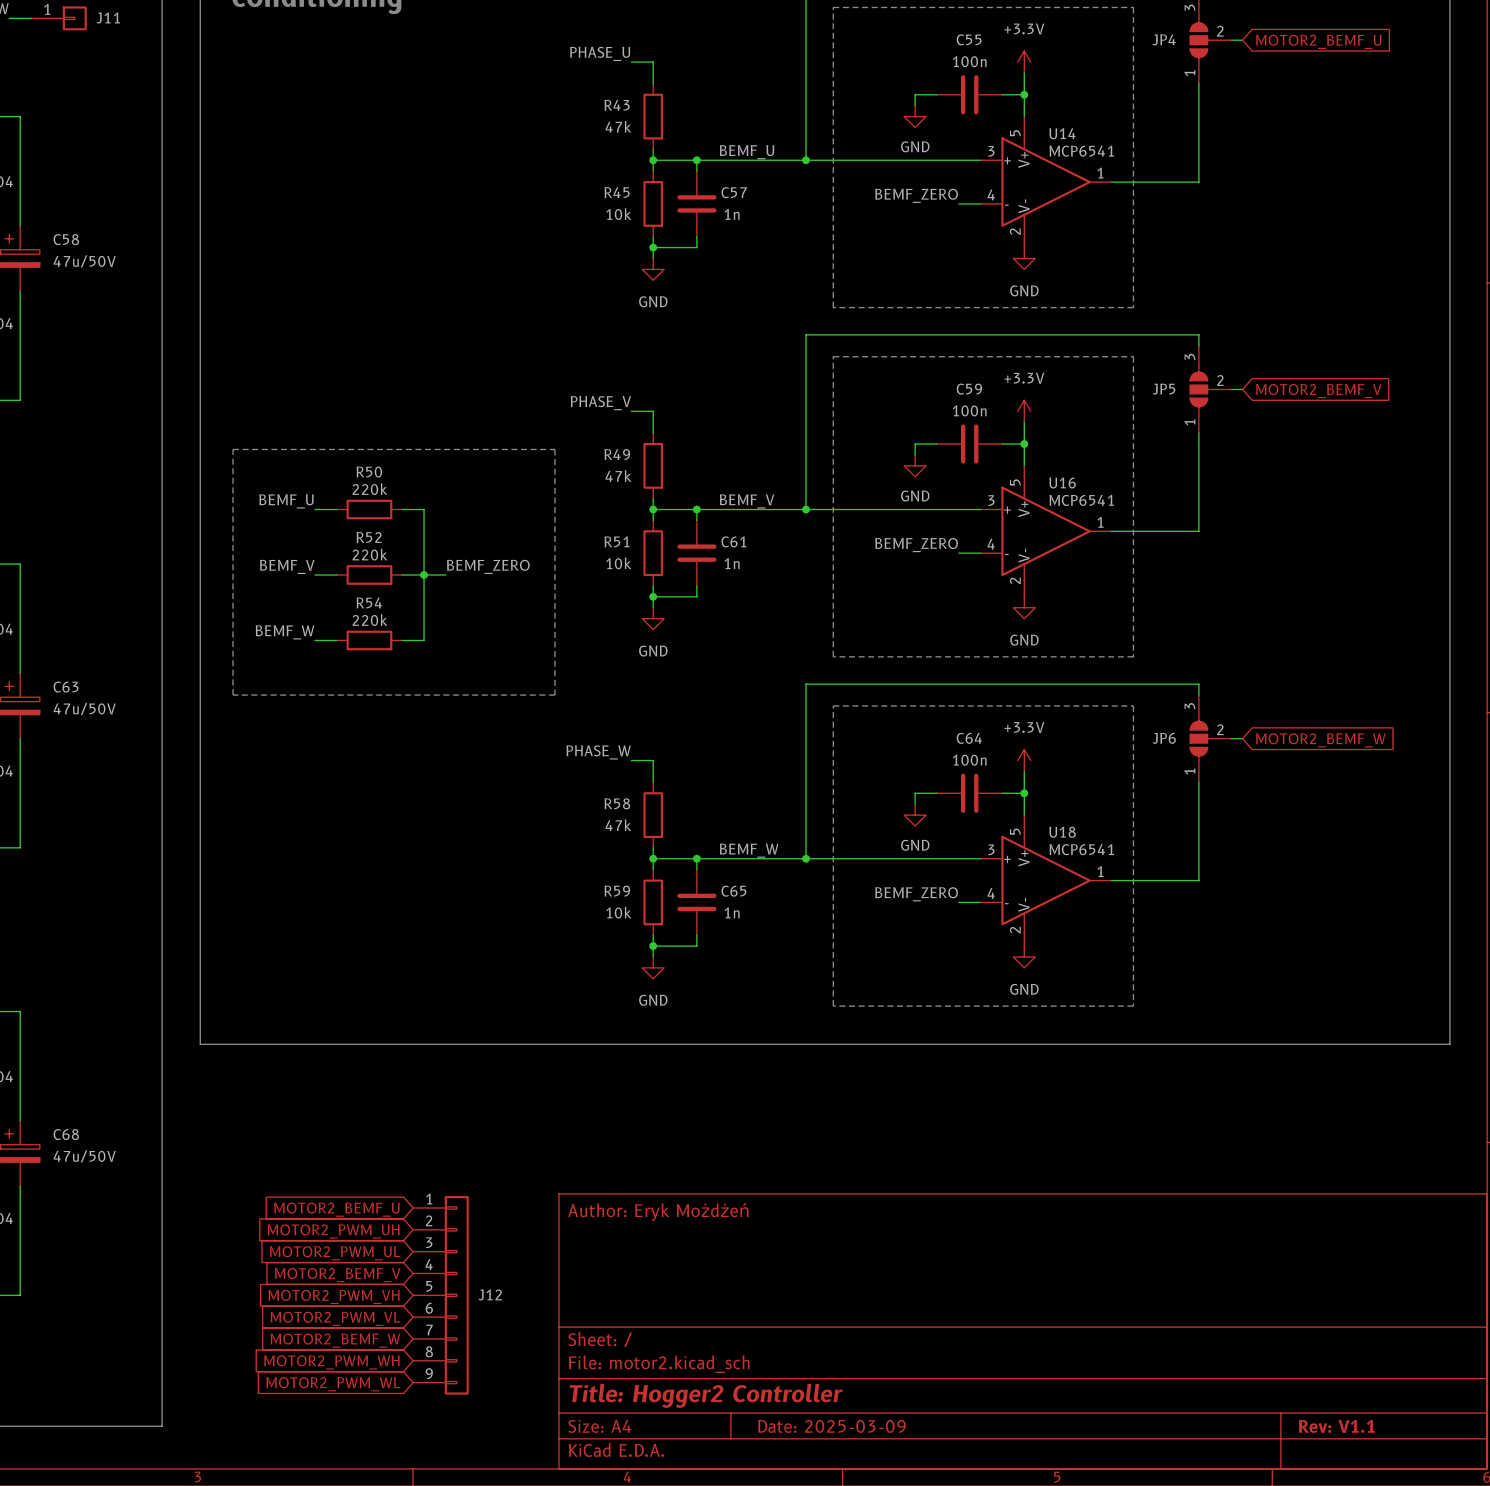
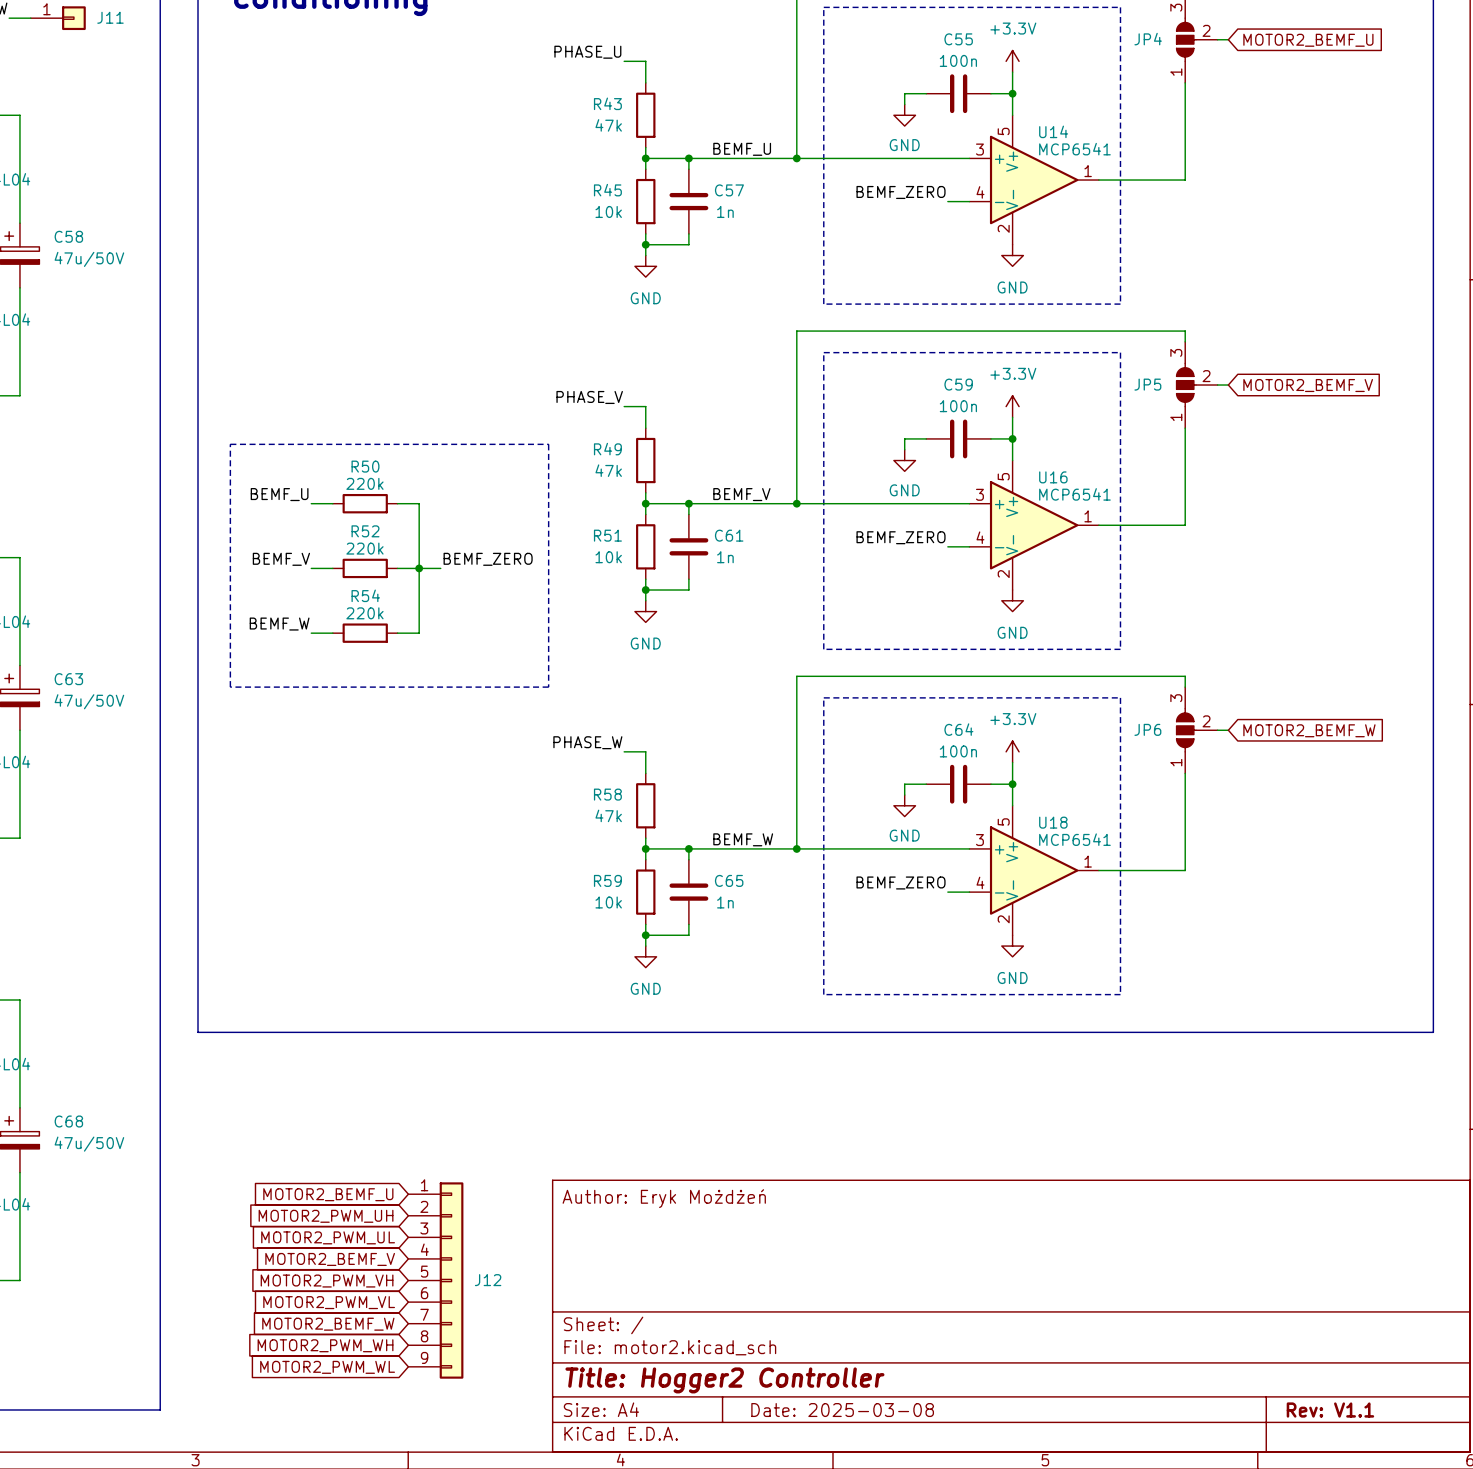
title block: Date: 2025-03-09 (831, 1426) -> Date: 2025-03-08 (842, 1410)

